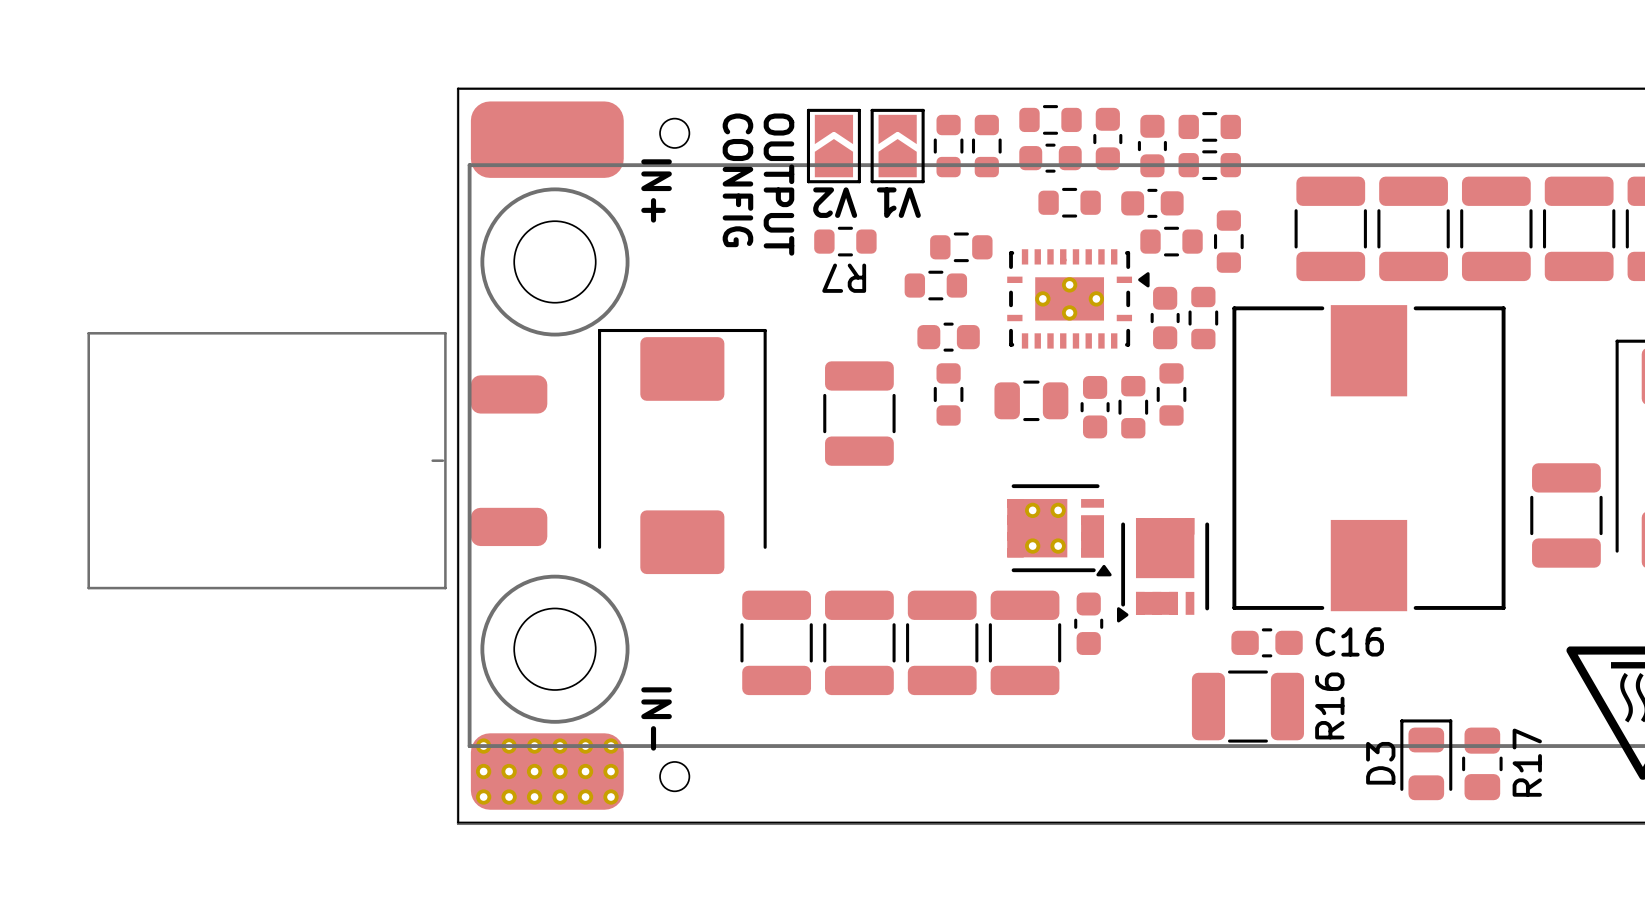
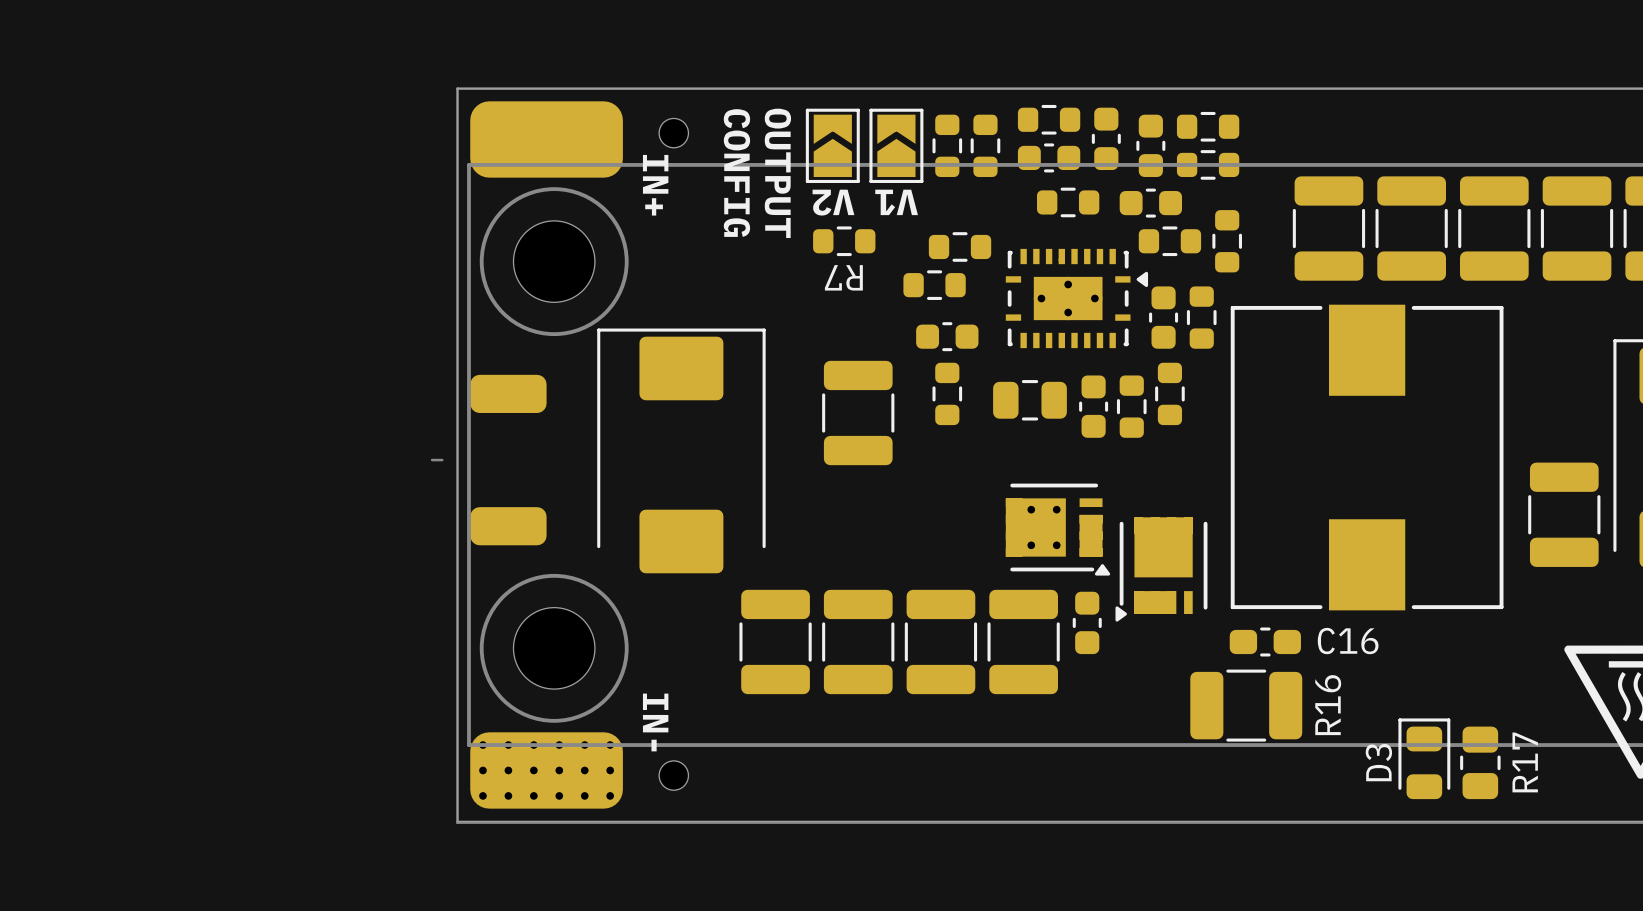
line: (88, 333) (445, 333) (445, 588) (88, 588) (88, 333) -> none

